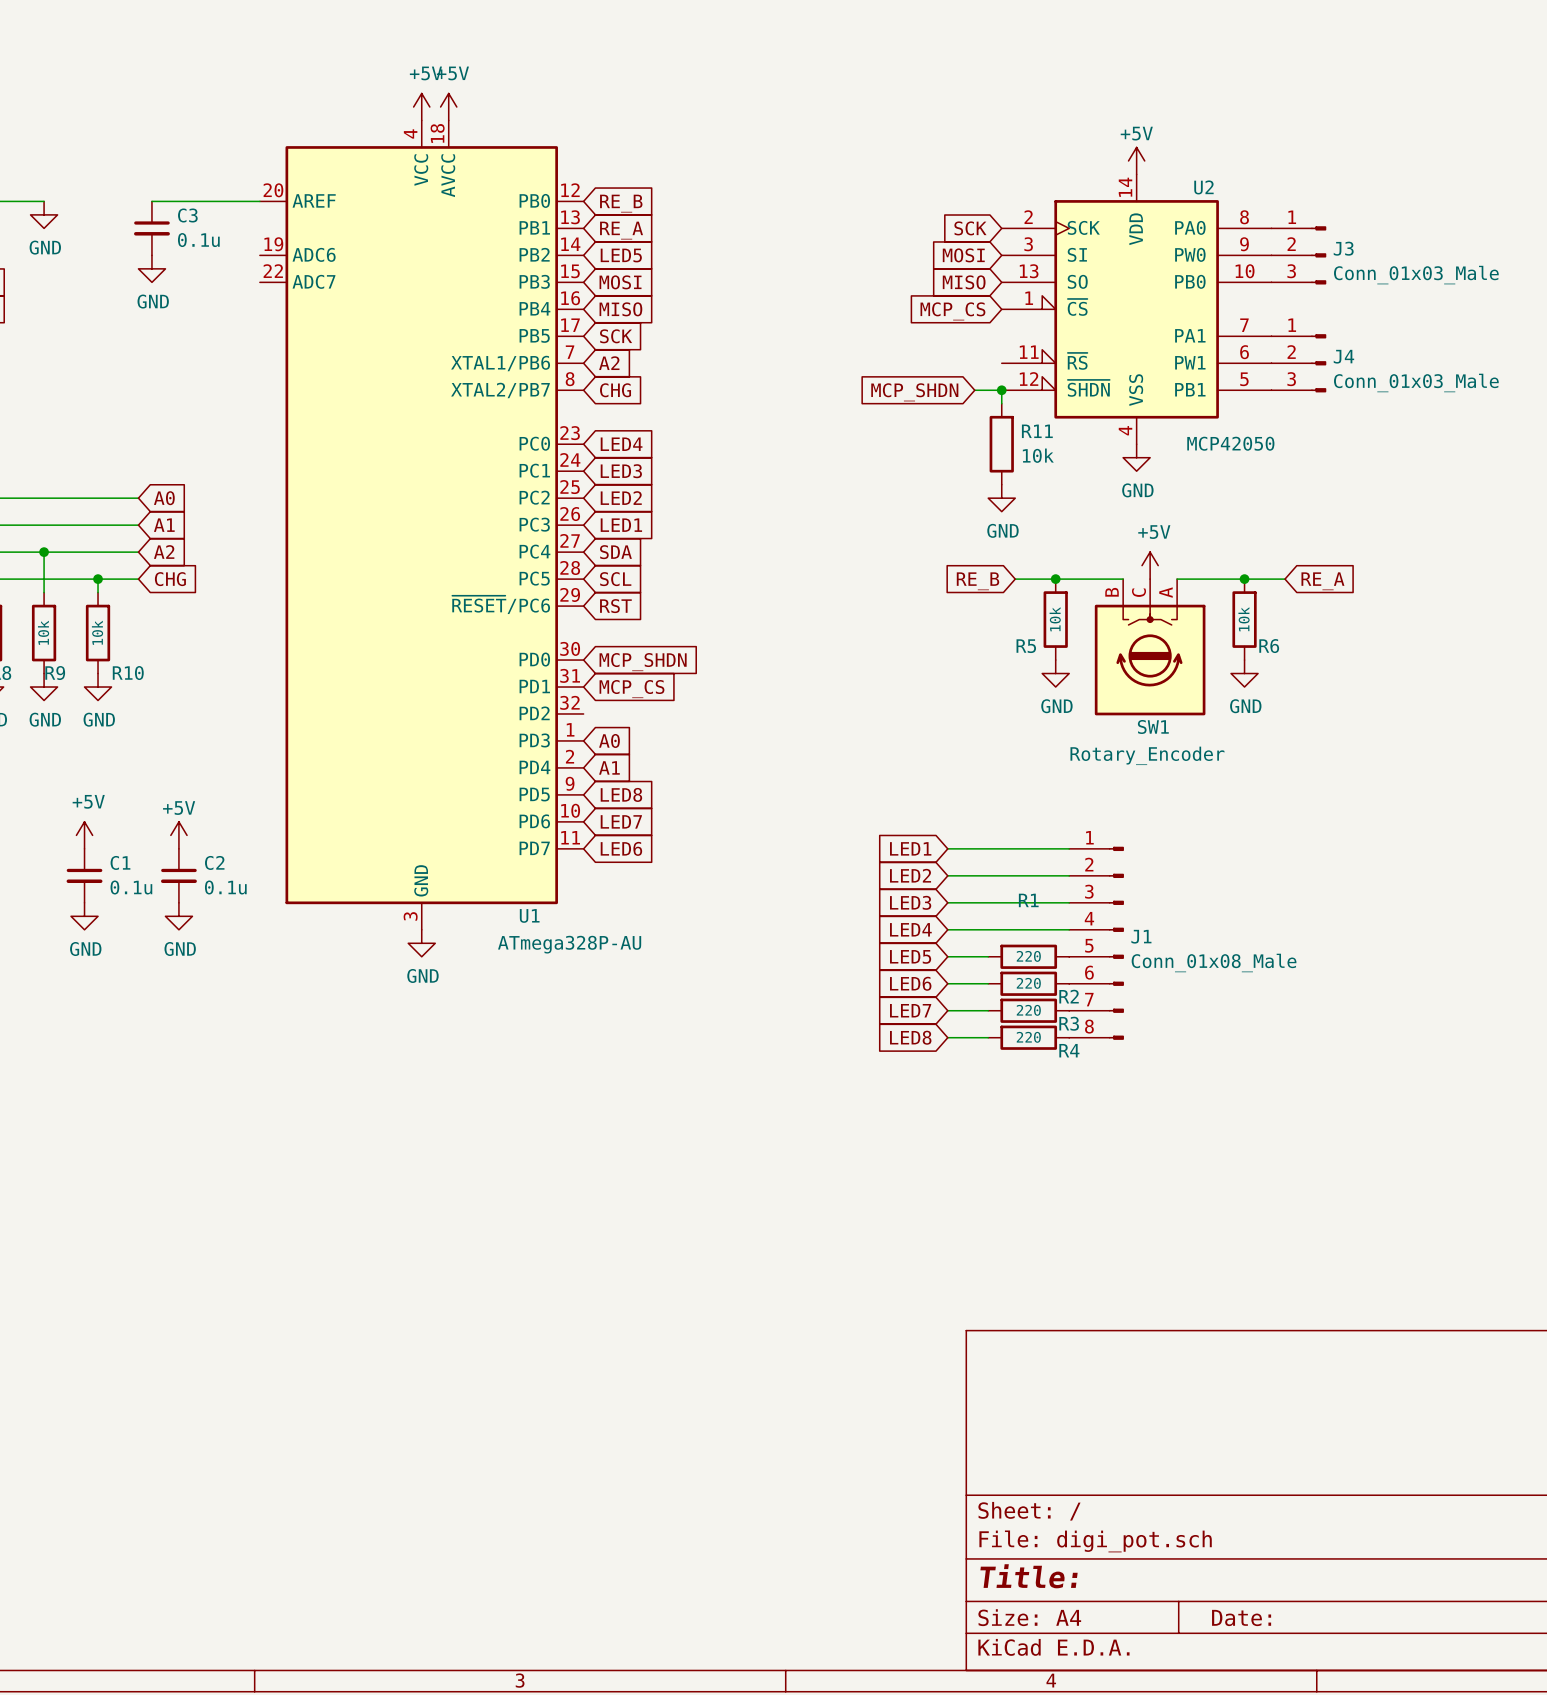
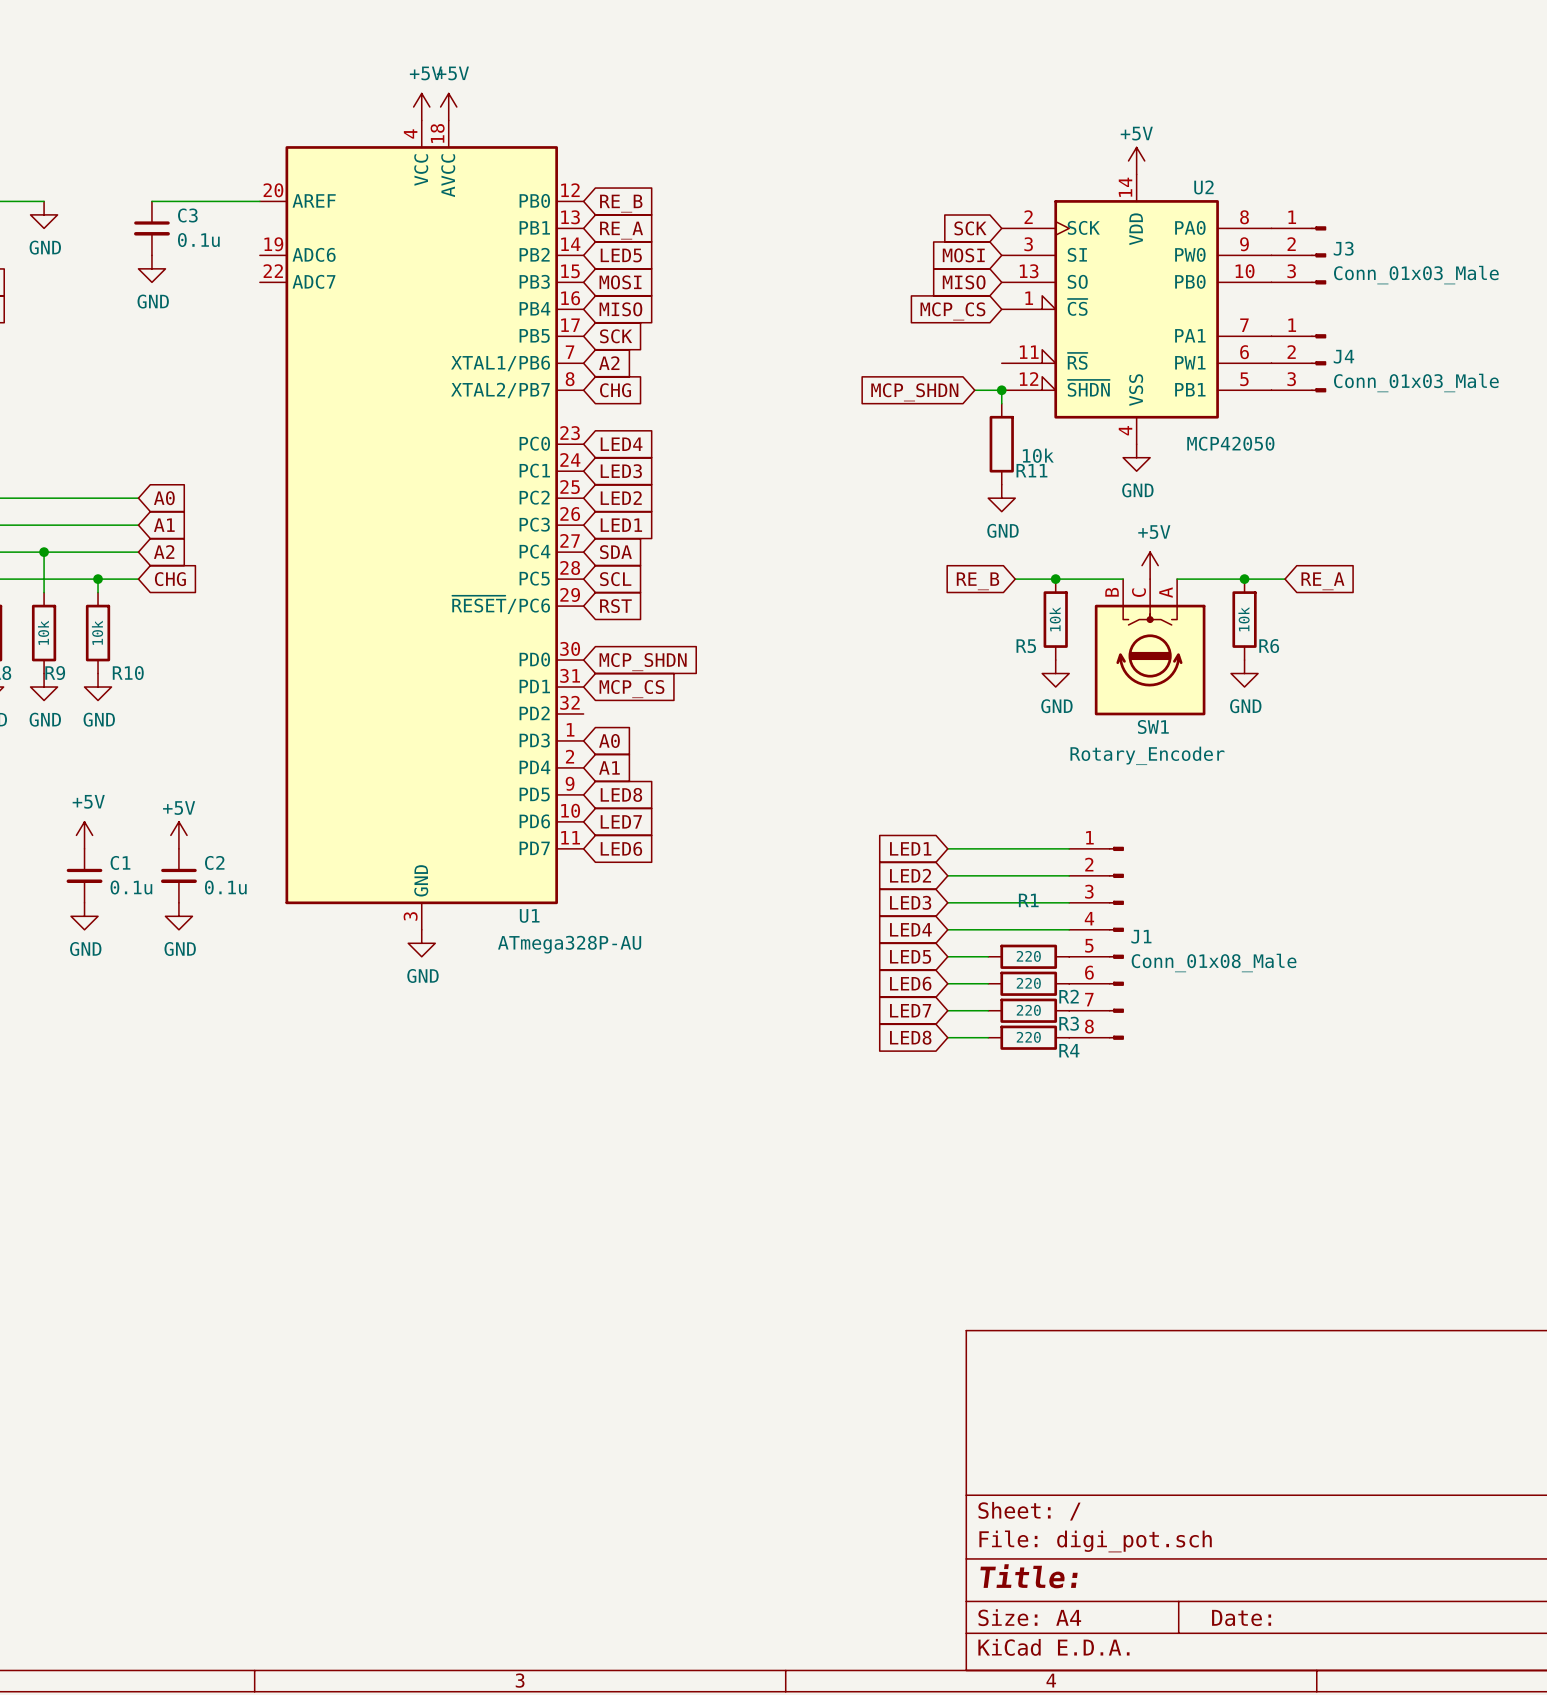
R11 name position: R11 (1037, 431) -> R11 (1031, 470)

